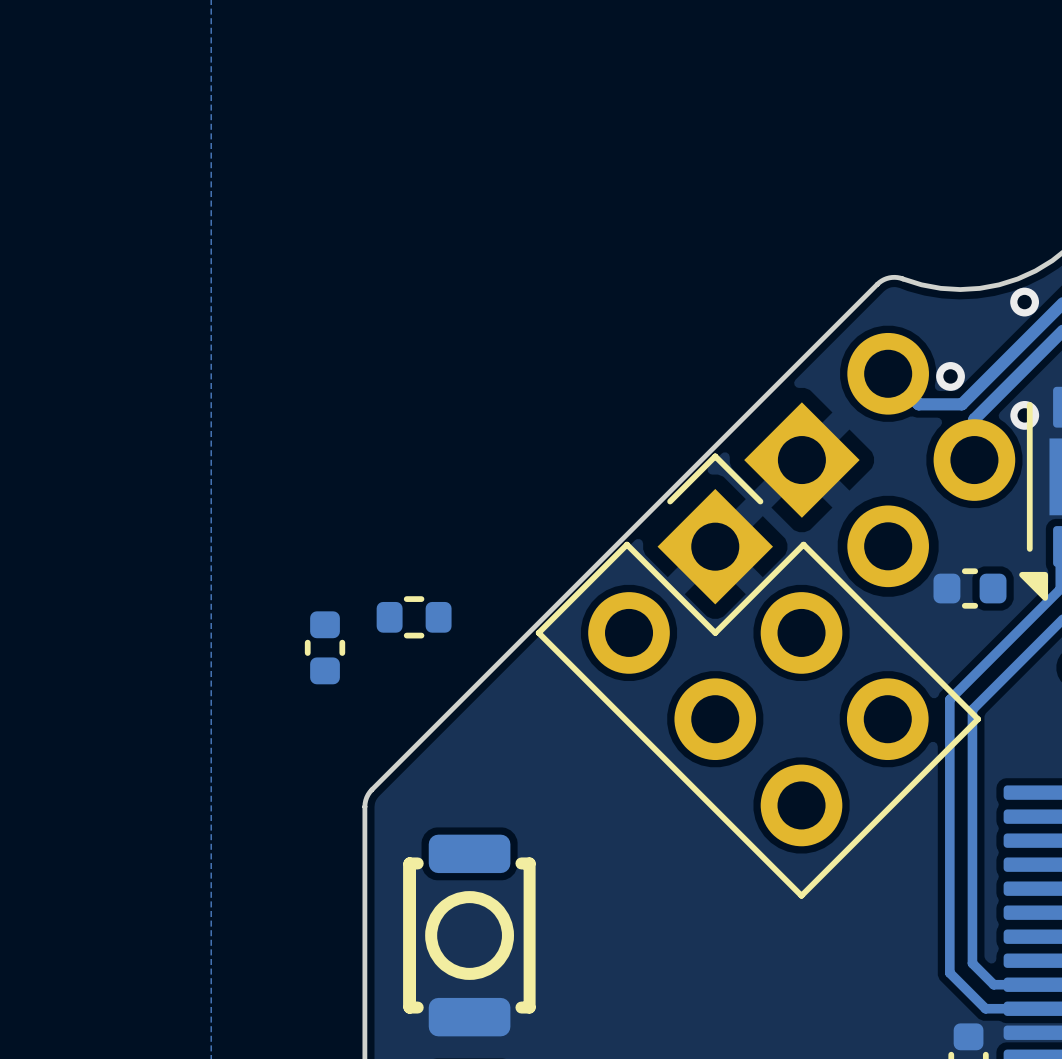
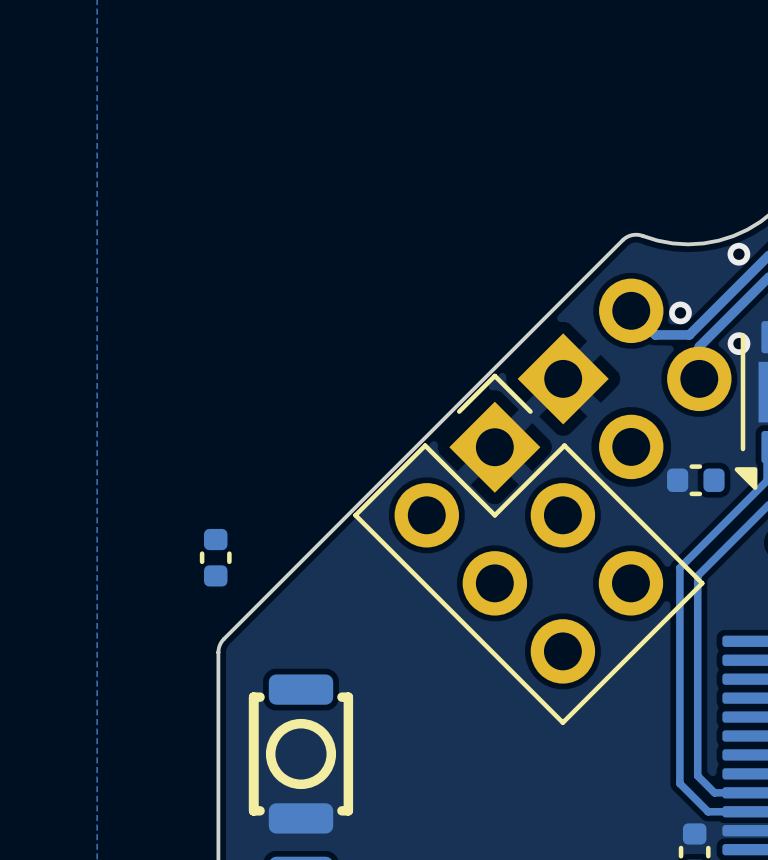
part: (414, 617) -> none
part position: (325, 647) -> (215, 557)

